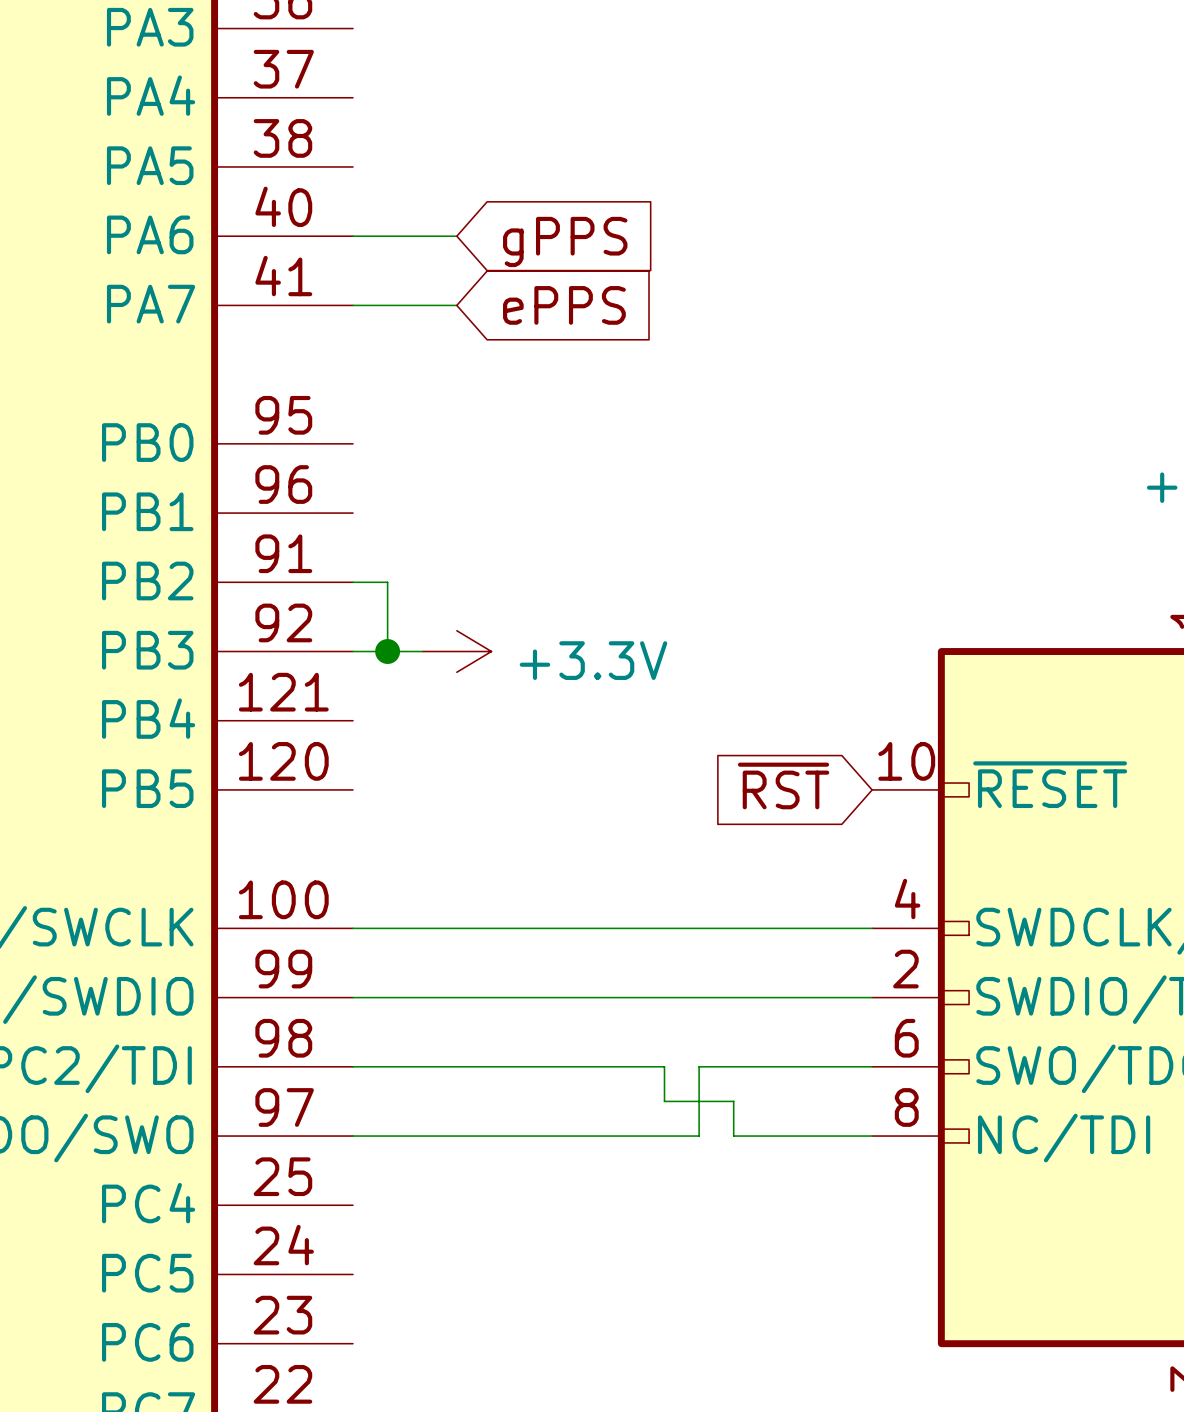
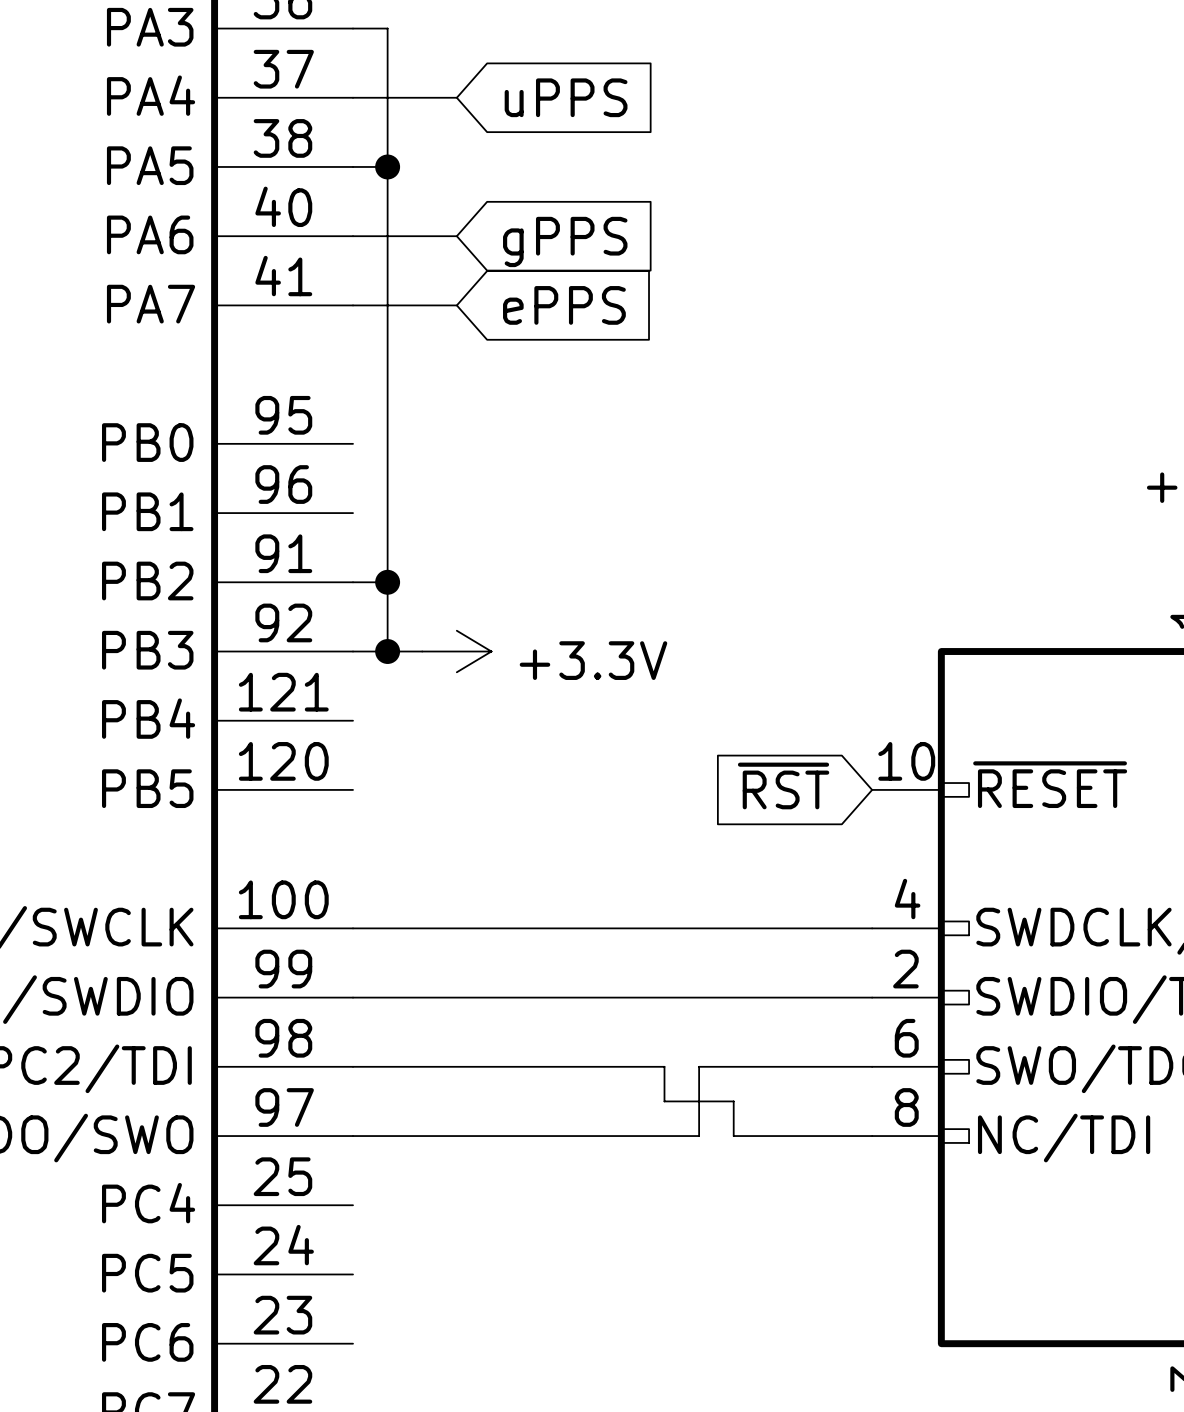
wire: none -> (353, 28) (387, 28) (387, 582)
wire: none -> (353, 97) (456, 97)
global label: none -> uPPS (566, 97)
wire: none -> (353, 166) (387, 166)
junction: none -> (387, 166)
junction: none -> (387, 582)

